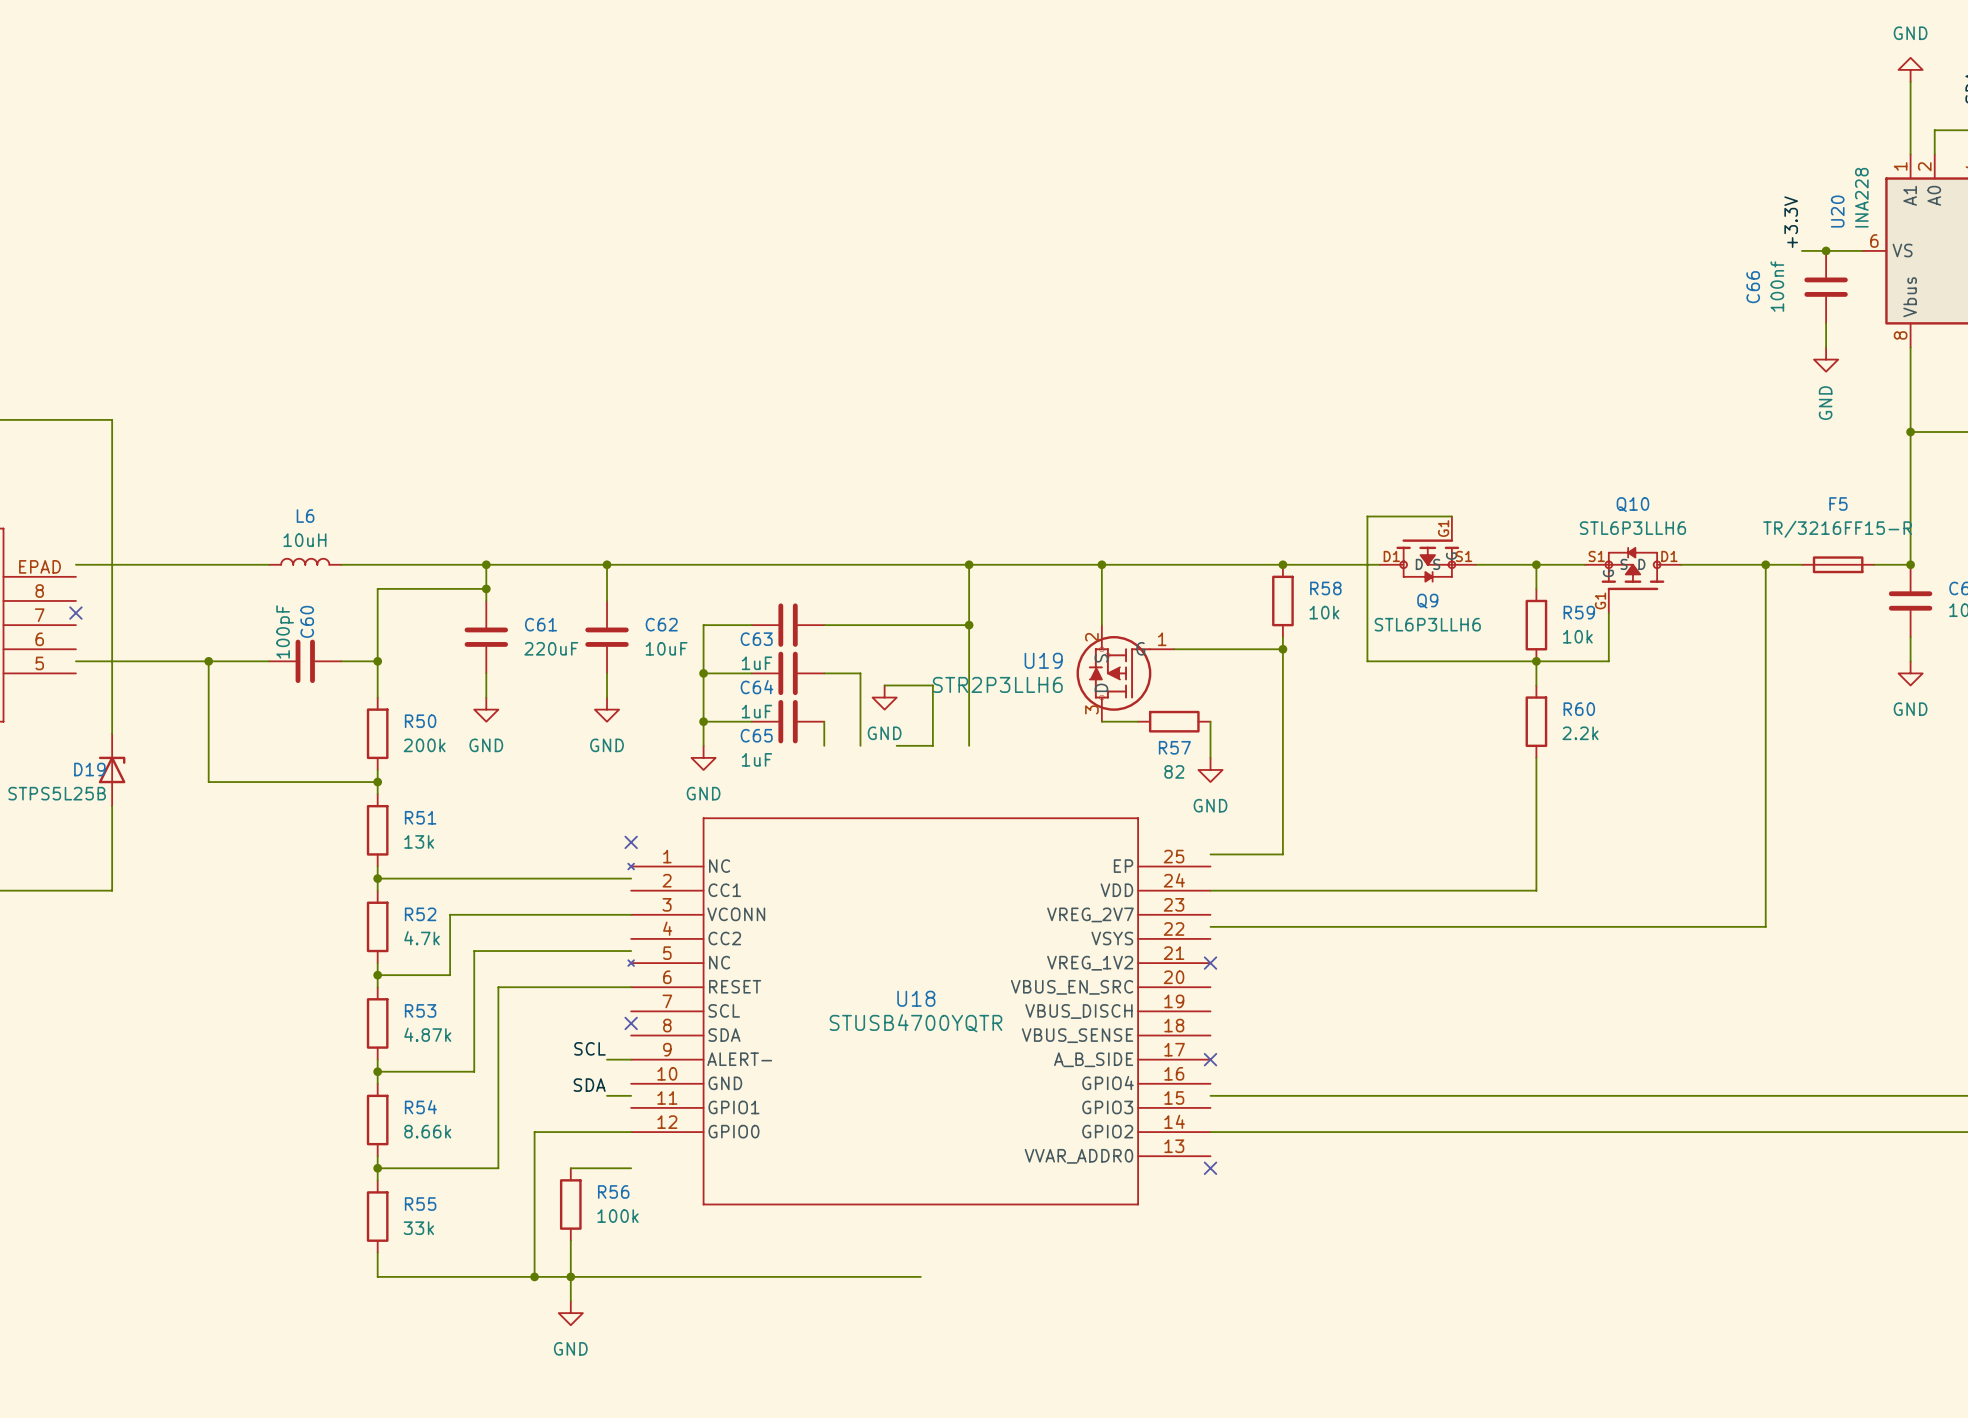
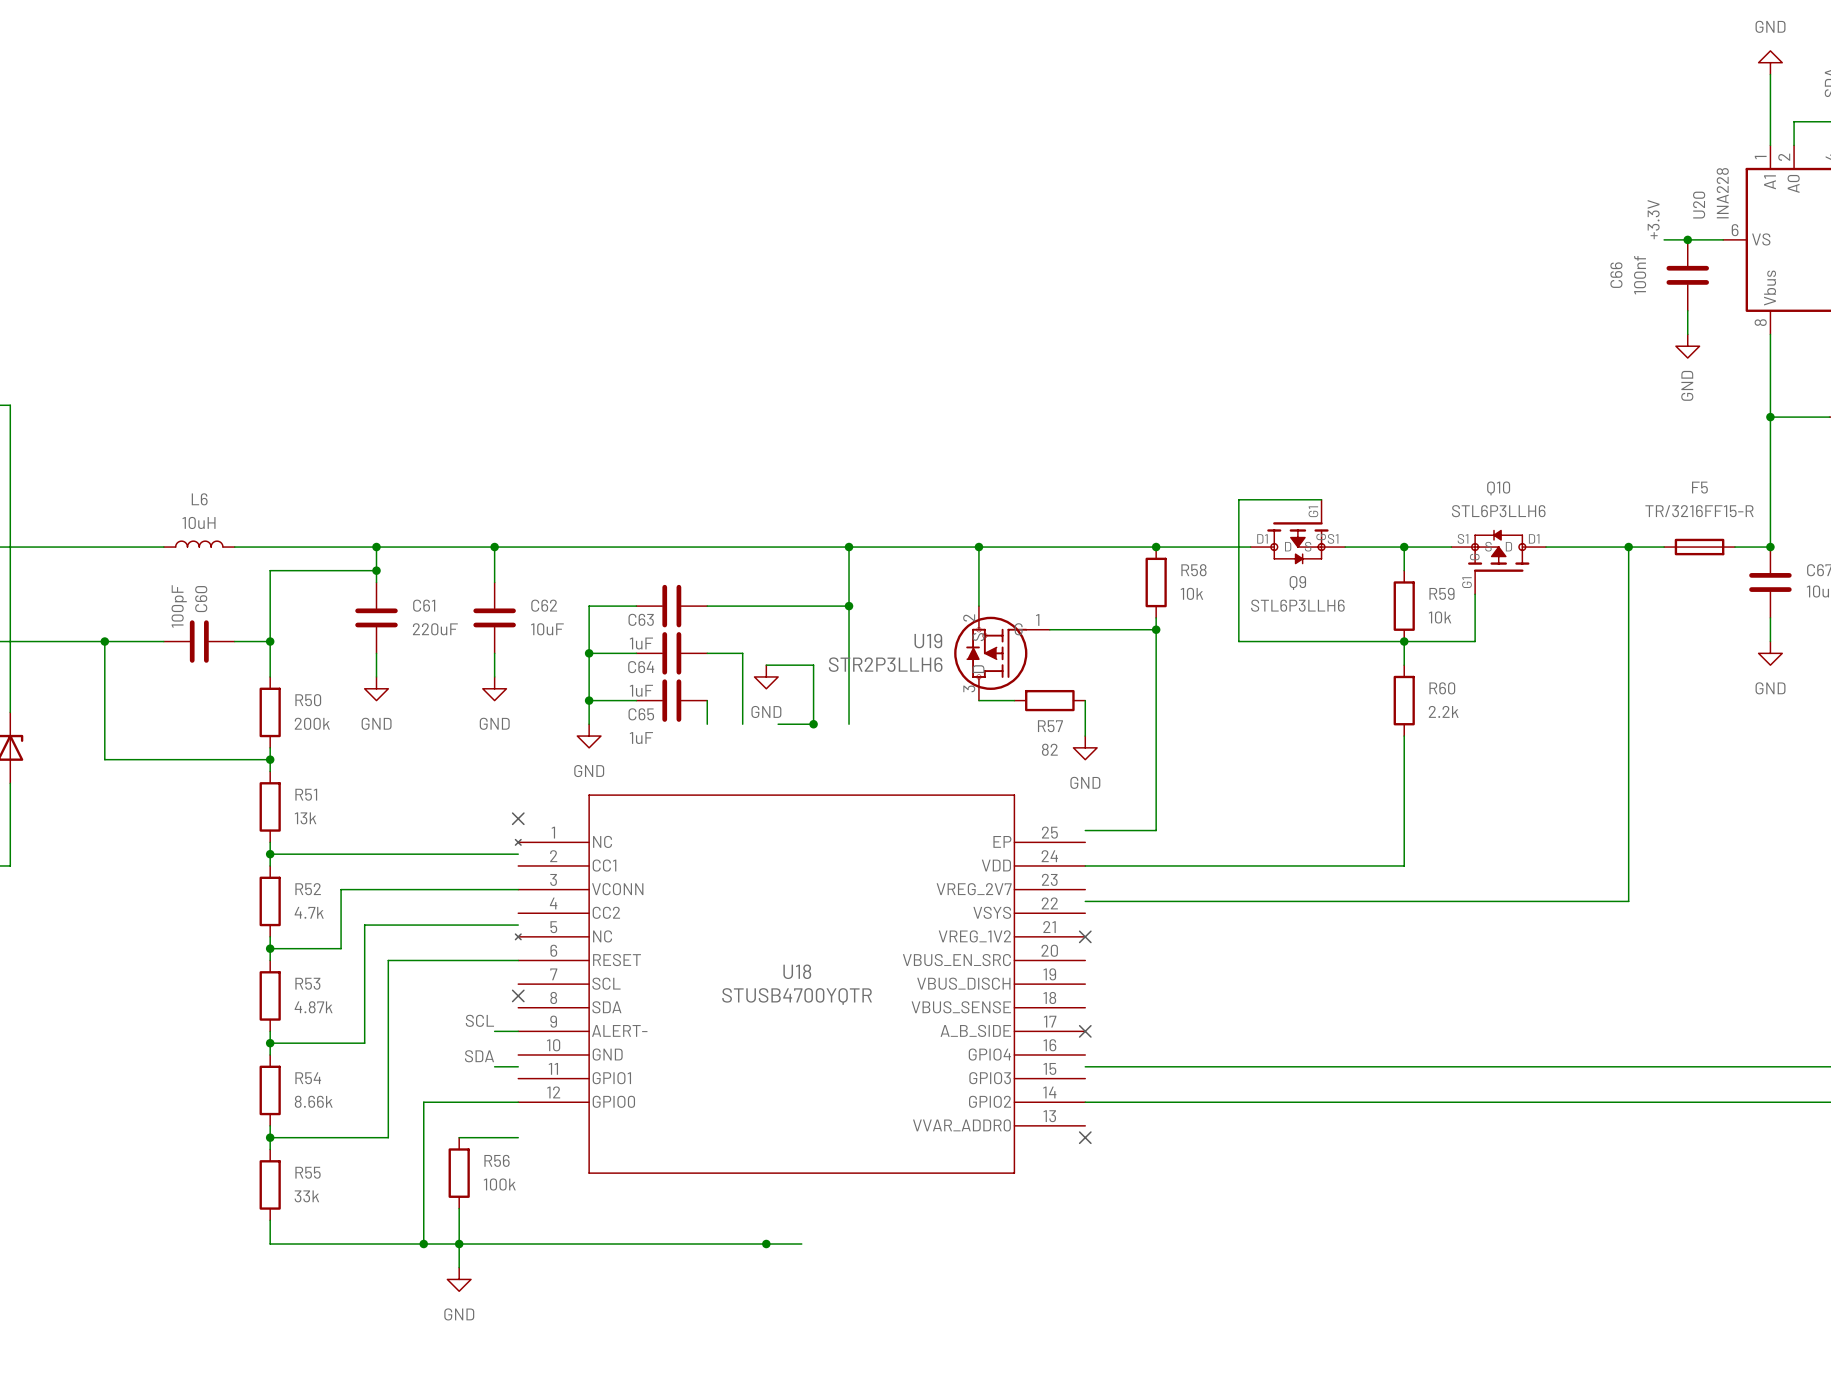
junction: none -> (813, 724)
junction: none -> (766, 1244)

